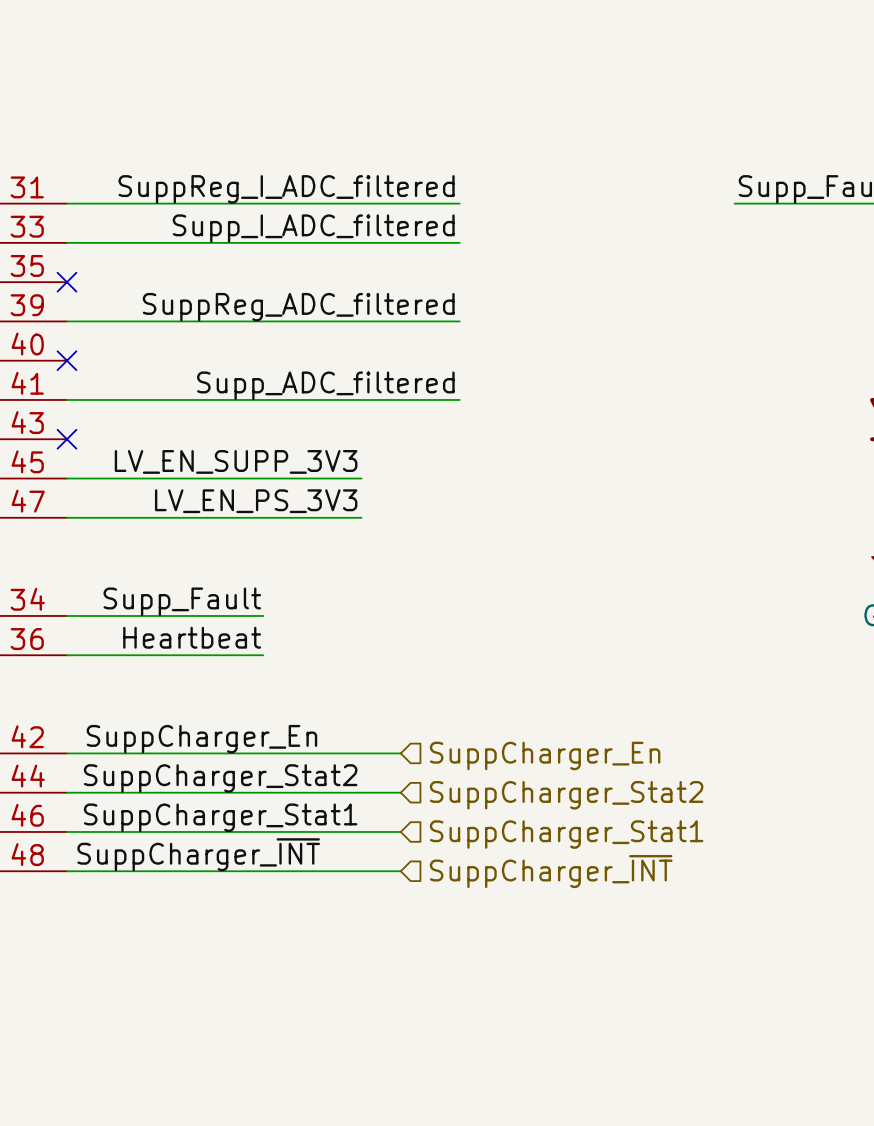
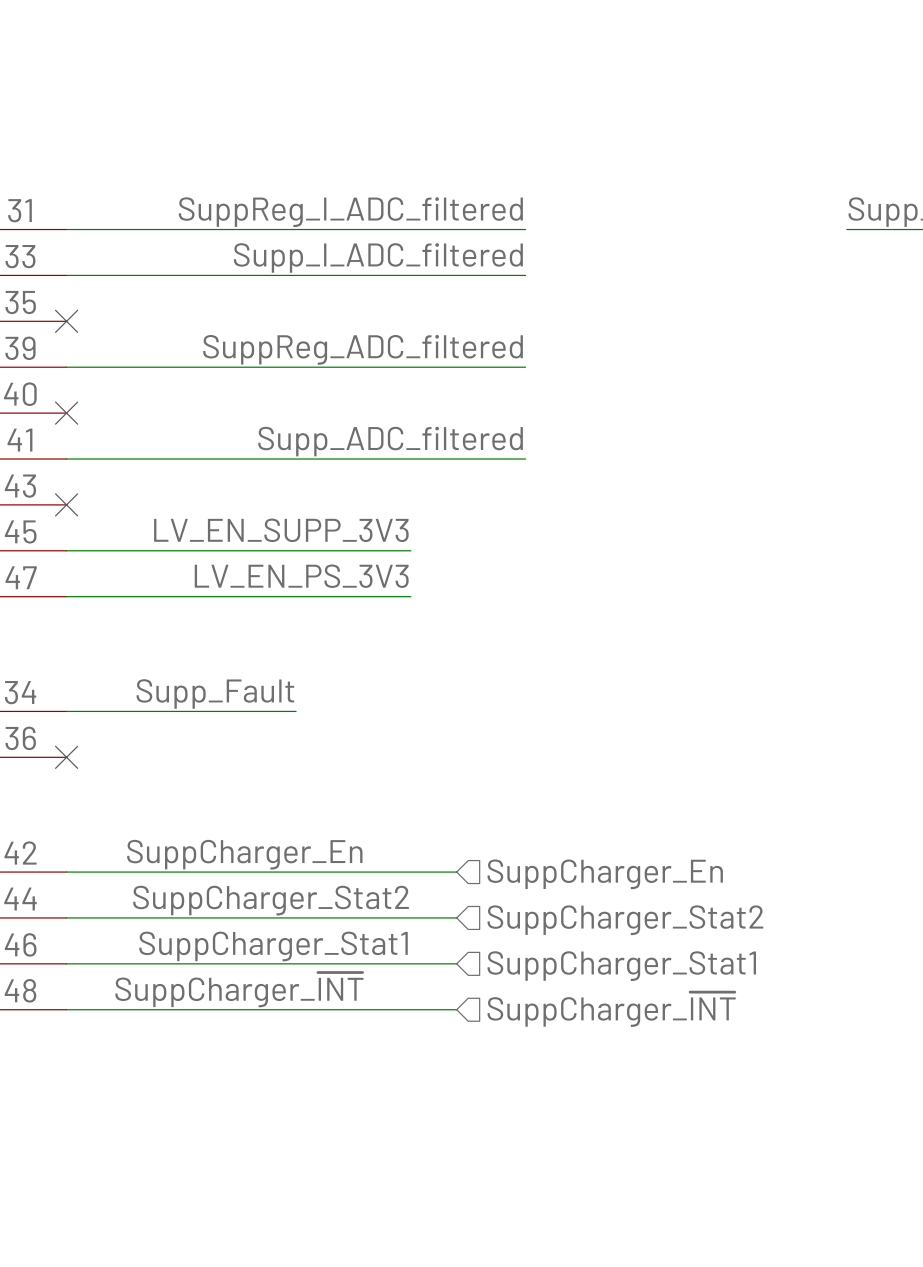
label: Heartbeat (192, 637) -> none
wire: (66, 655) (263, 655) -> none
no-connect mark: none -> (66, 757)

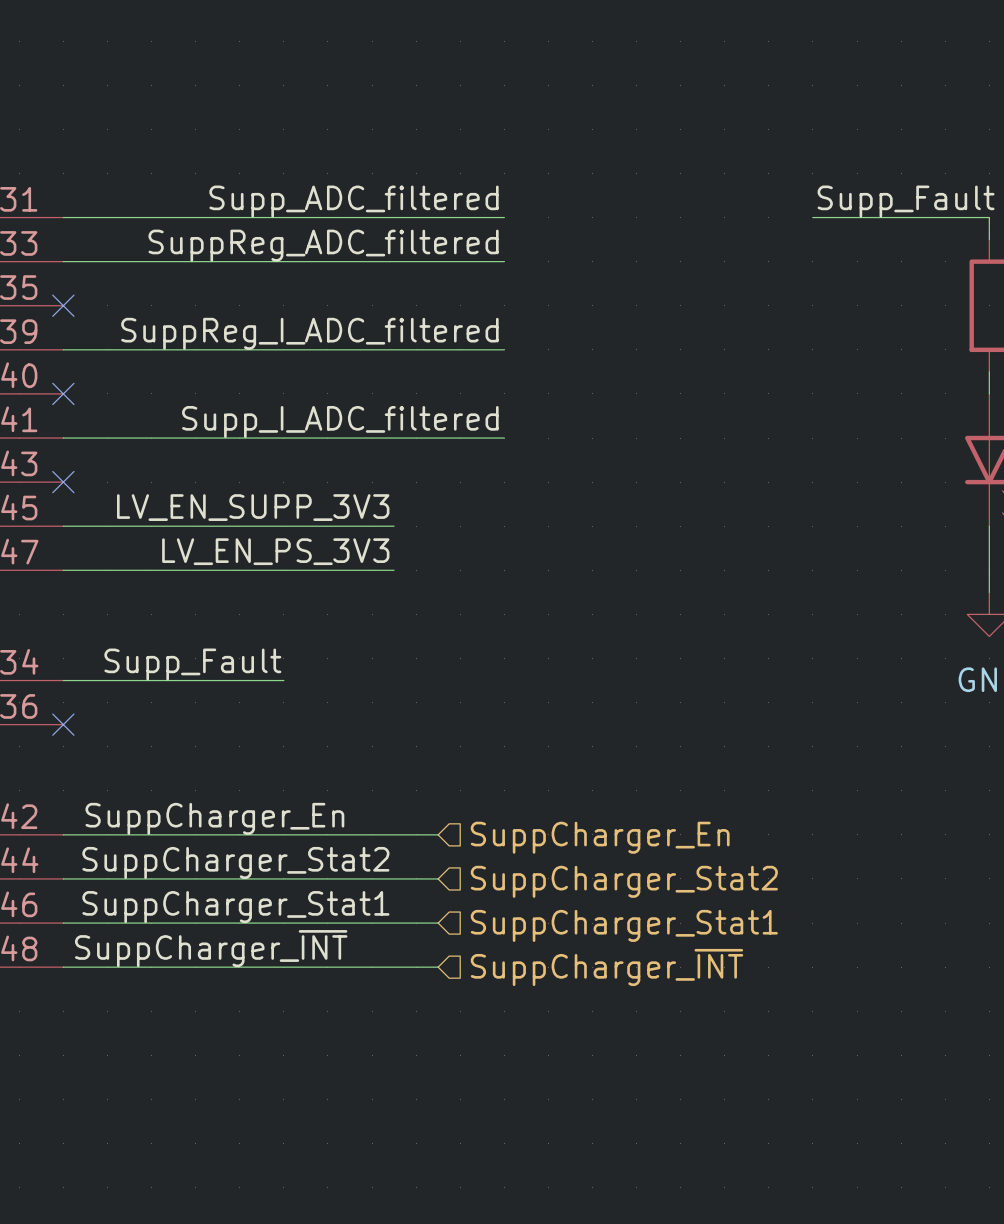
label: SuppReg_I_ADC_filtered (350, 212) -> Supp_ADC_filtered (354, 201)
label: Supp_I_ADC_filtered (378, 257) -> SuppReg_ADC_filtered (323, 245)
label: SuppReg_ADC_filtered (363, 349) -> SuppReg_I_ADC_filtered (309, 333)
label: Supp_ADC_filtered (390, 441) -> Supp_I_ADC_filtered (340, 422)

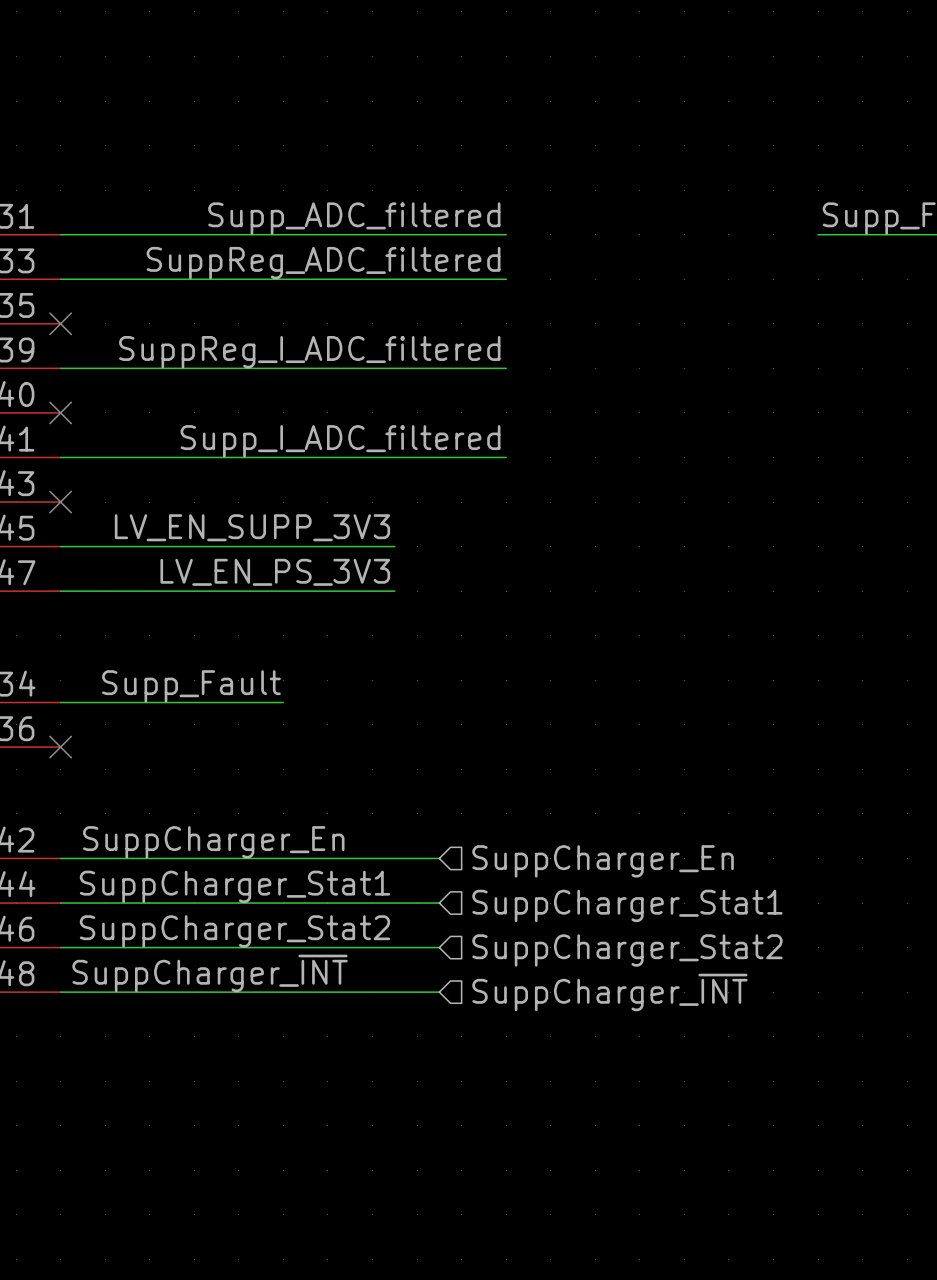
label: SuppCharger_Stat2 (235, 862) -> SuppCharger_Stat1 (234, 886)
hierarchical label: SuppCharger_Stat2 (624, 881) -> SuppCharger_Stat1 (627, 905)
label: SuppCharger_Stat1 (235, 907) -> SuppCharger_Stat2 (234, 931)
hierarchical label: SuppCharger_Stat1 (624, 925) -> SuppCharger_Stat2 (627, 950)

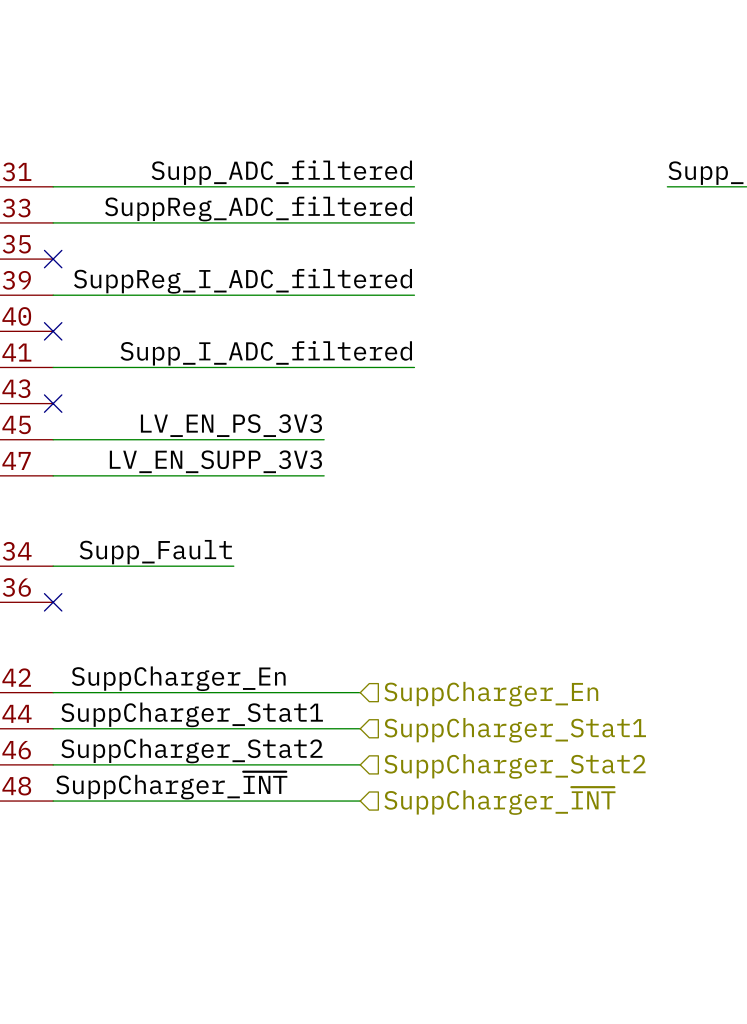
label: LV_EN_SUPP_3V3 (252, 527) -> LV_EN_PS_3V3 (231, 425)
label: LV_EN_PS_3V3 (275, 572) -> LV_EN_SUPP_3V3 (215, 461)

